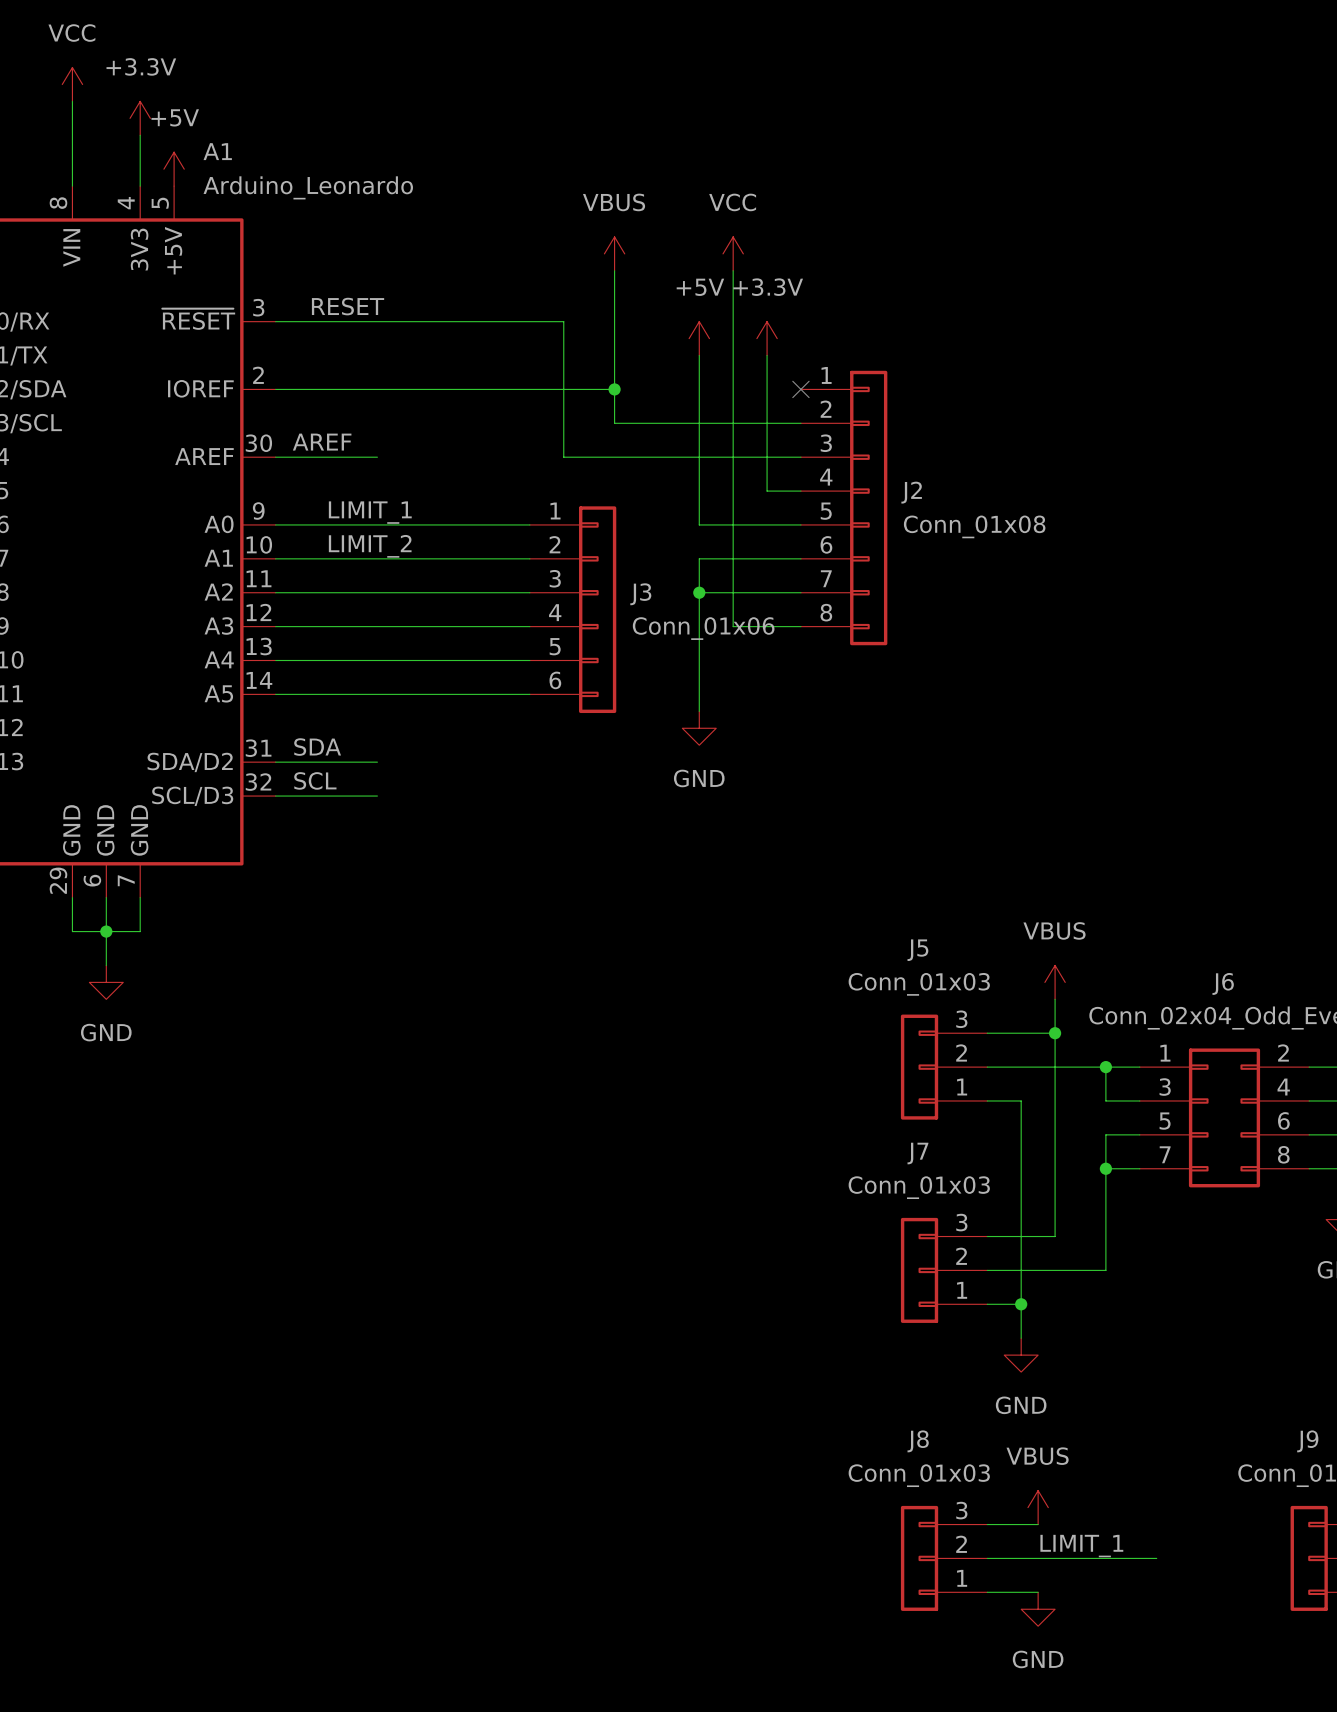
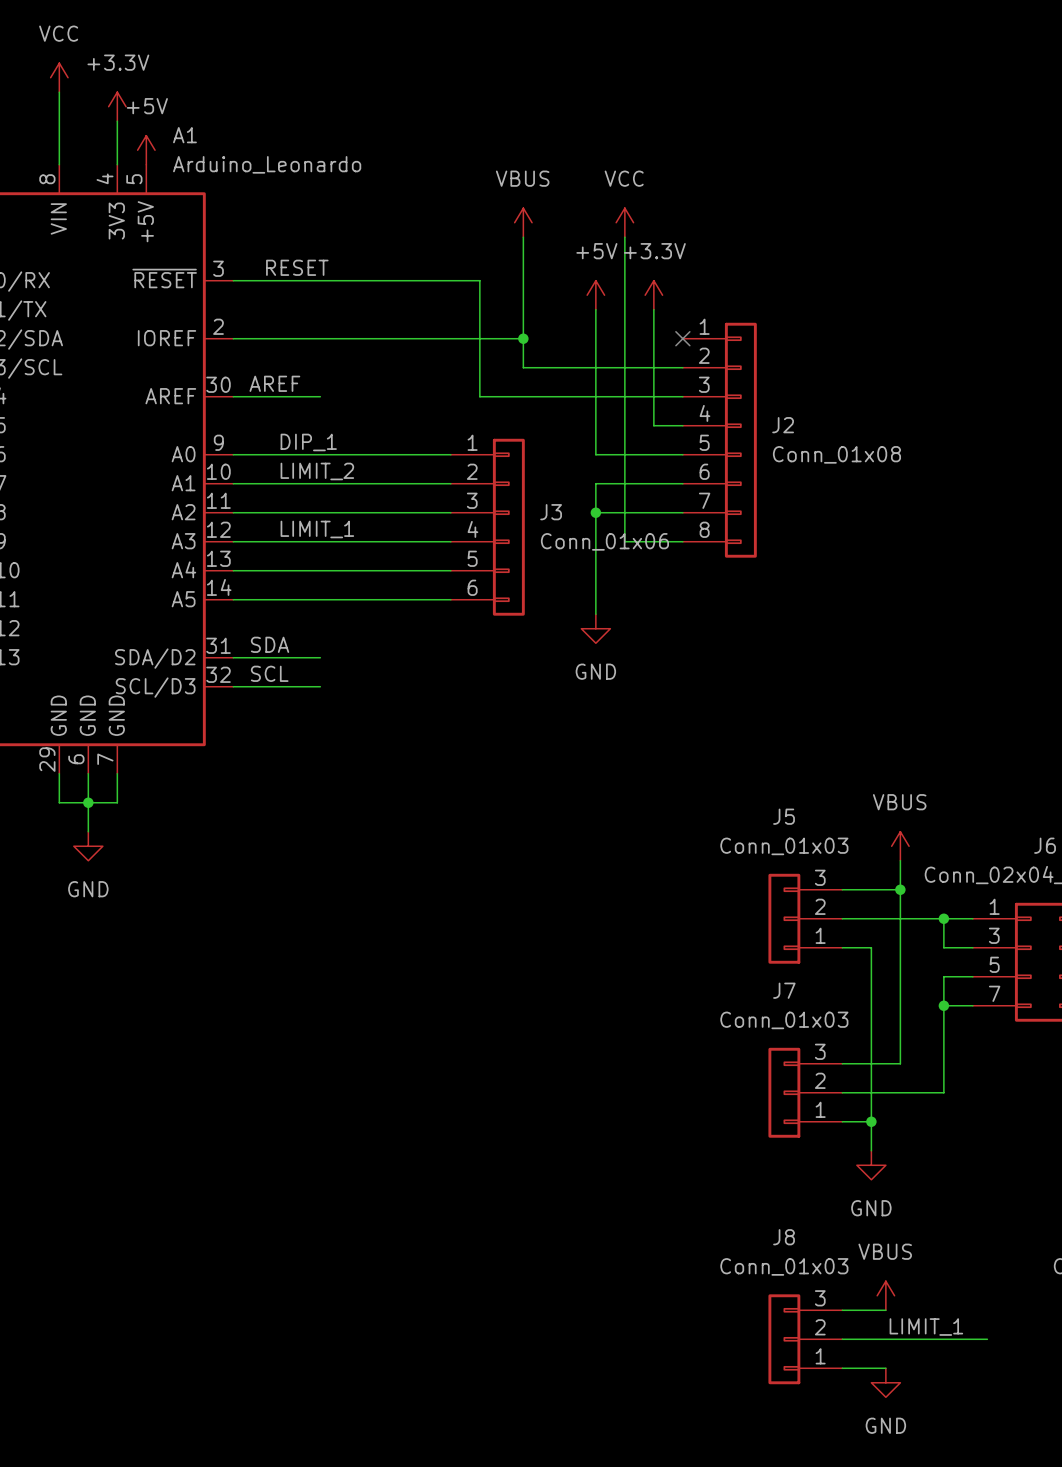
label: LIMIT_1 (370, 512) -> DIP_1 (308, 442)
label: none -> LIMIT_1 (317, 529)

